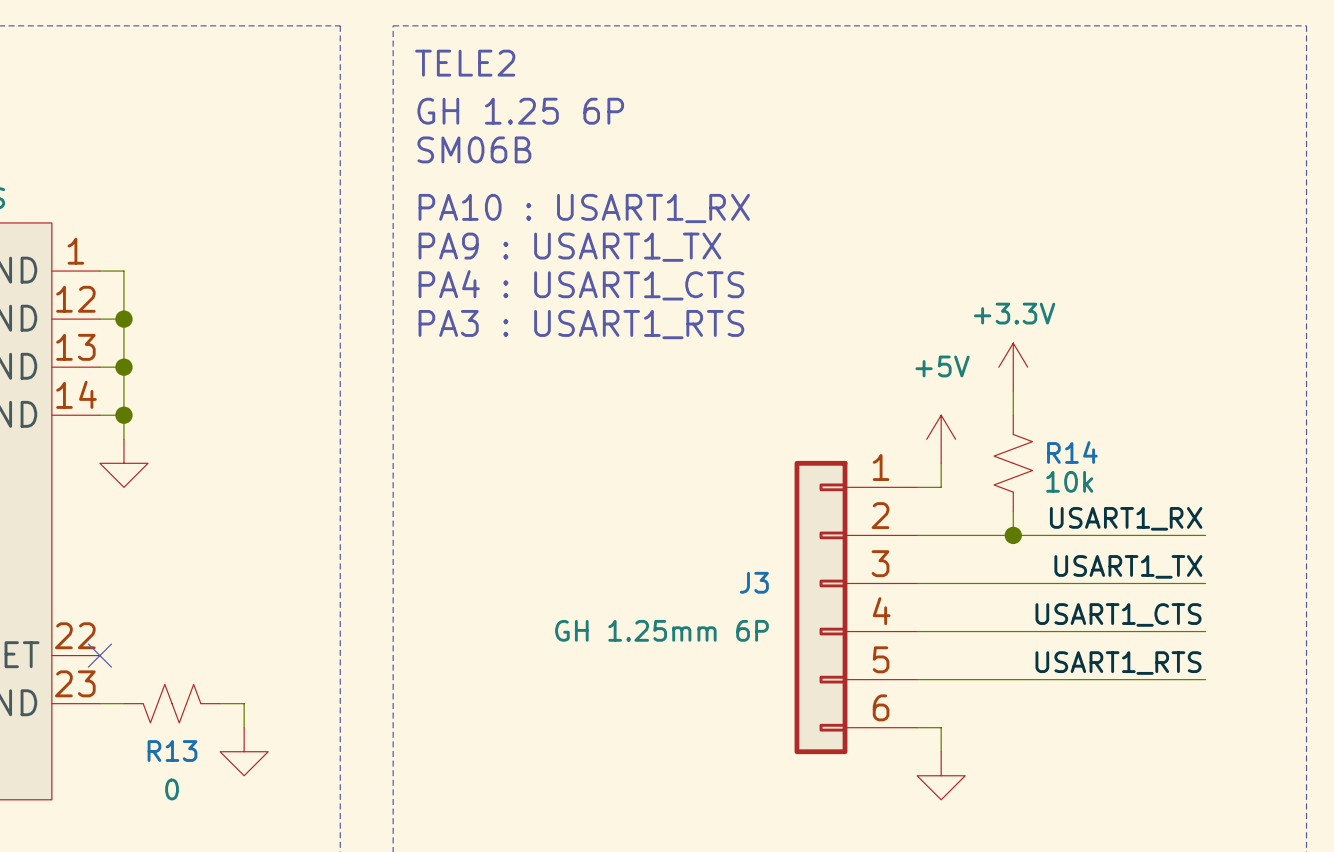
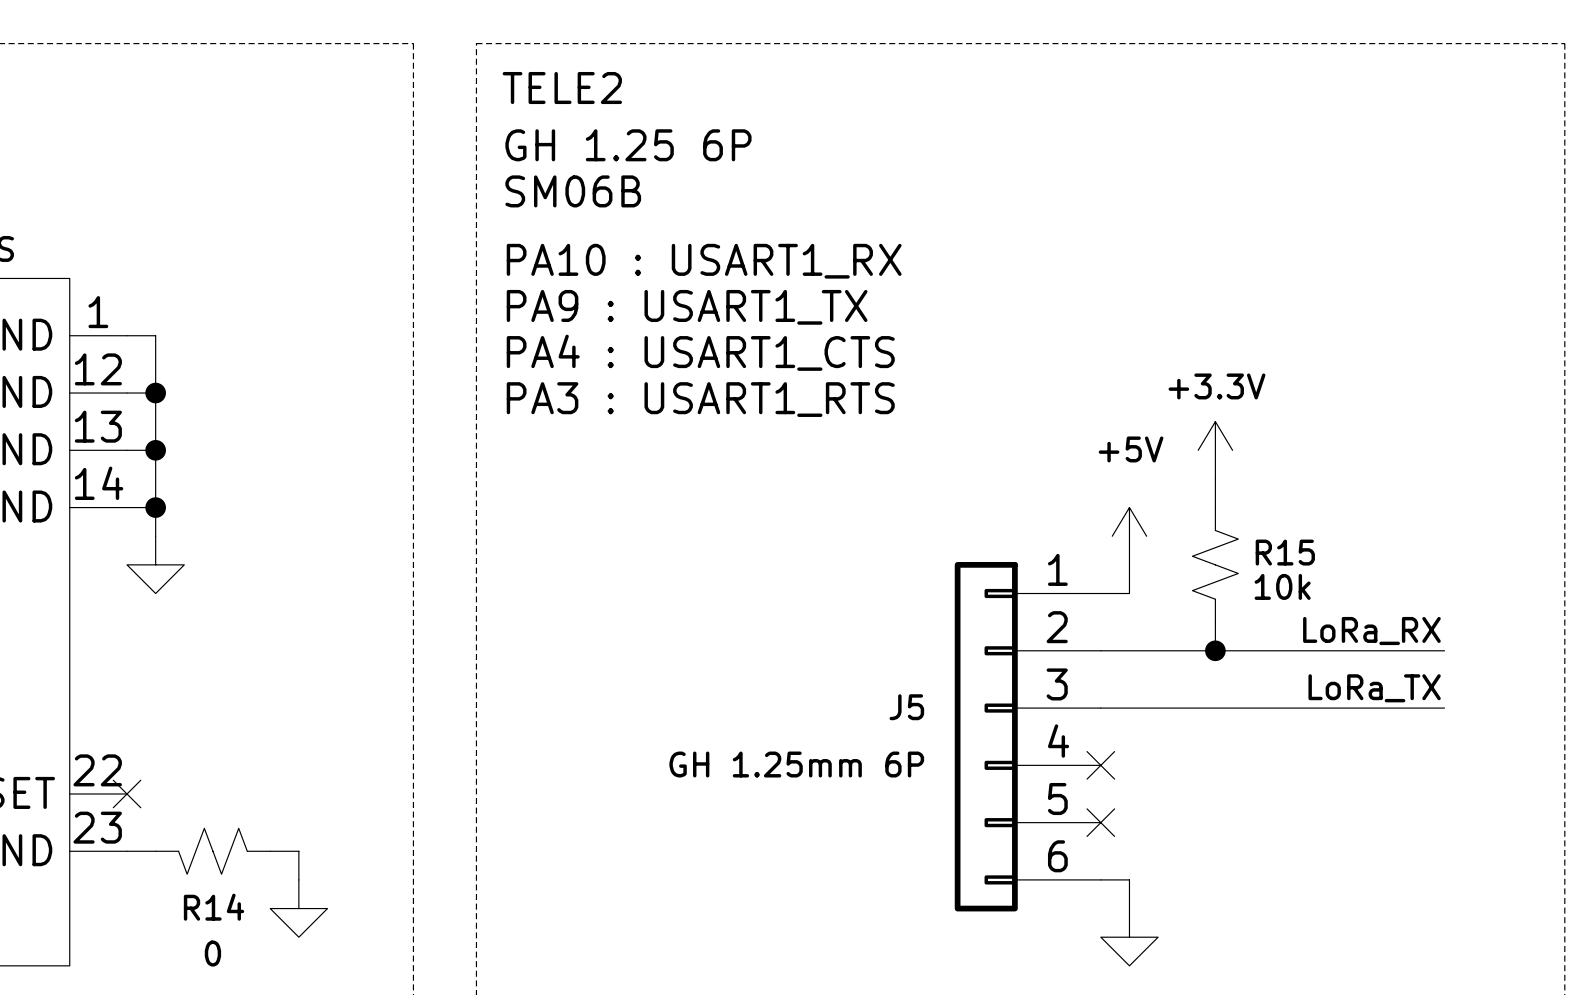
R14 name: R14 (1072, 452) -> R15 (1285, 552)
label: USART1_RX (1126, 518) -> LoRa_RX (1371, 631)
label: USART1_TX (1128, 566) -> LoRa_TX (1374, 688)
J3 name: J3 (754, 582) -> J5 (906, 707)
label: USART1_CTS (1118, 614) -> none
wire: (917, 631) (1205, 631) -> none
no-connect mark: none -> (1100, 765)
label: USART1_RTS (1118, 663) -> none
wire: (917, 679) (1205, 679) -> none
no-connect mark: none -> (1100, 822)
R13 name: R13 (172, 751) -> R14 (214, 907)

